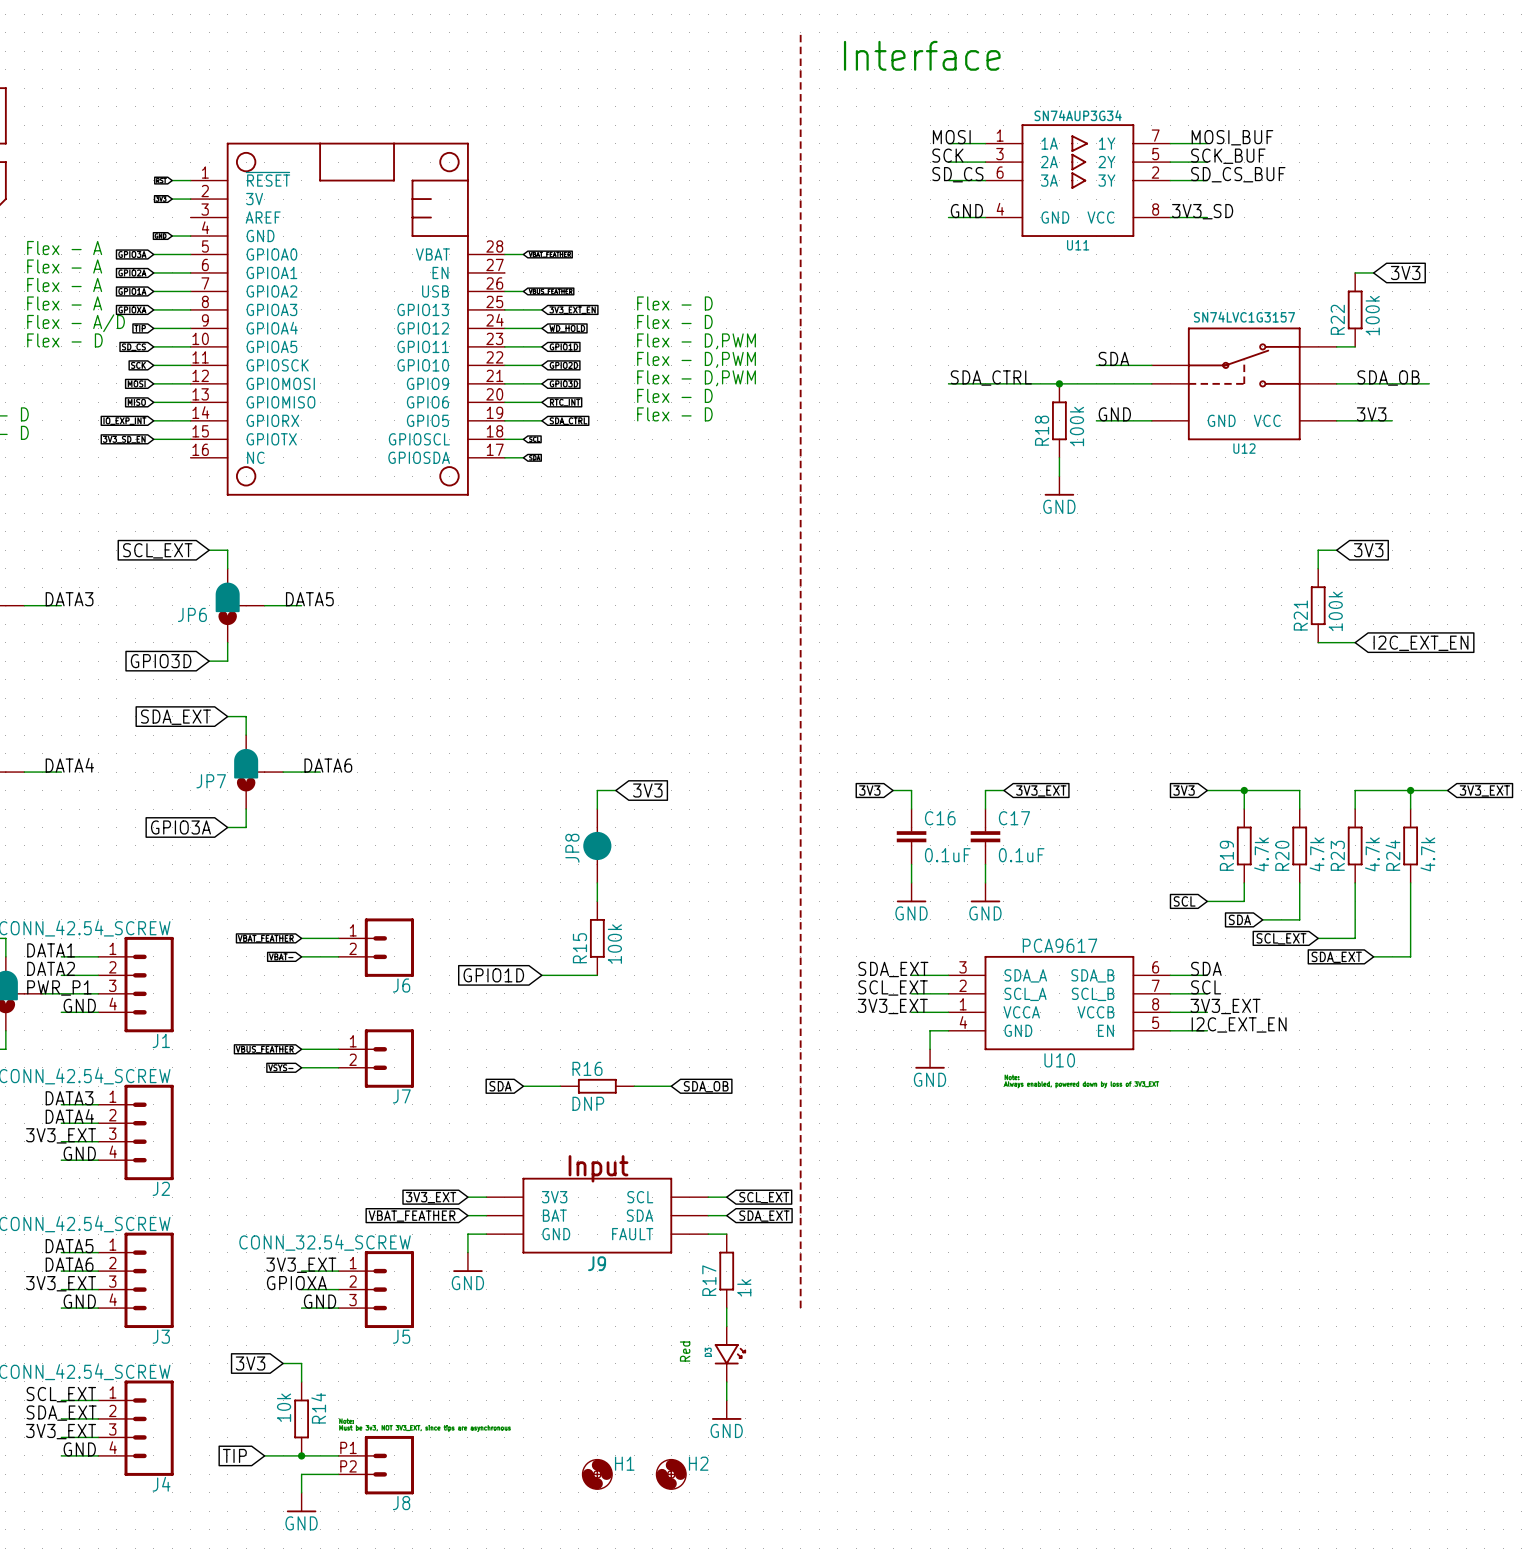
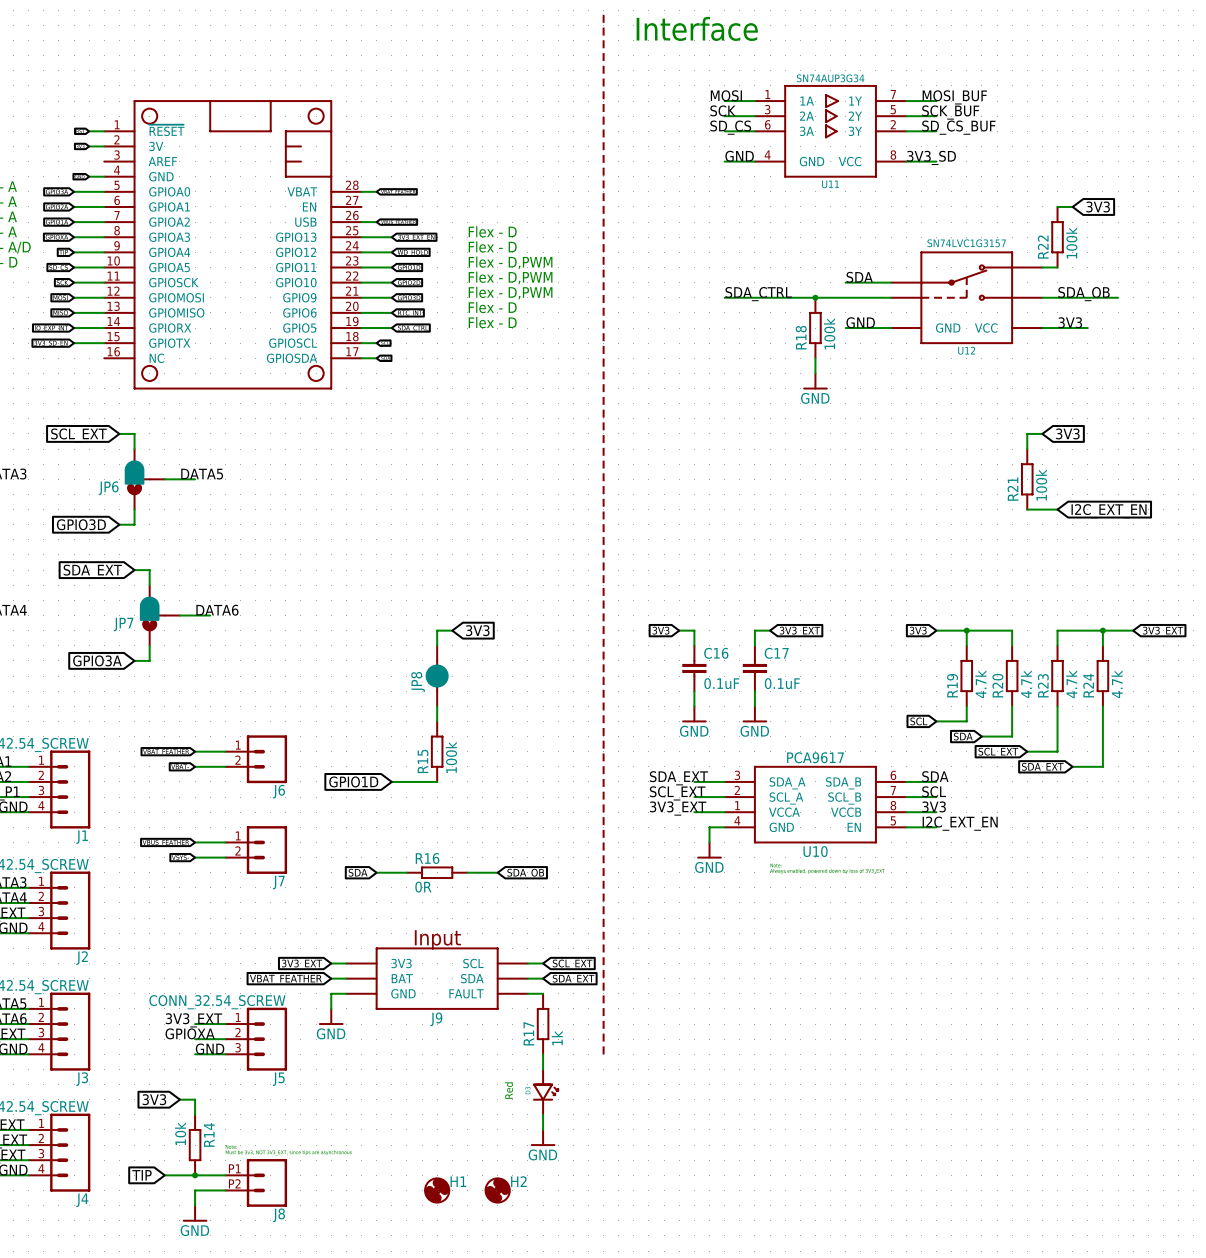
label: 3V3_EXT (1225, 1006) -> 3V3 (934, 806)
R16 value: DNP (588, 1103) -> 0R (423, 887)

